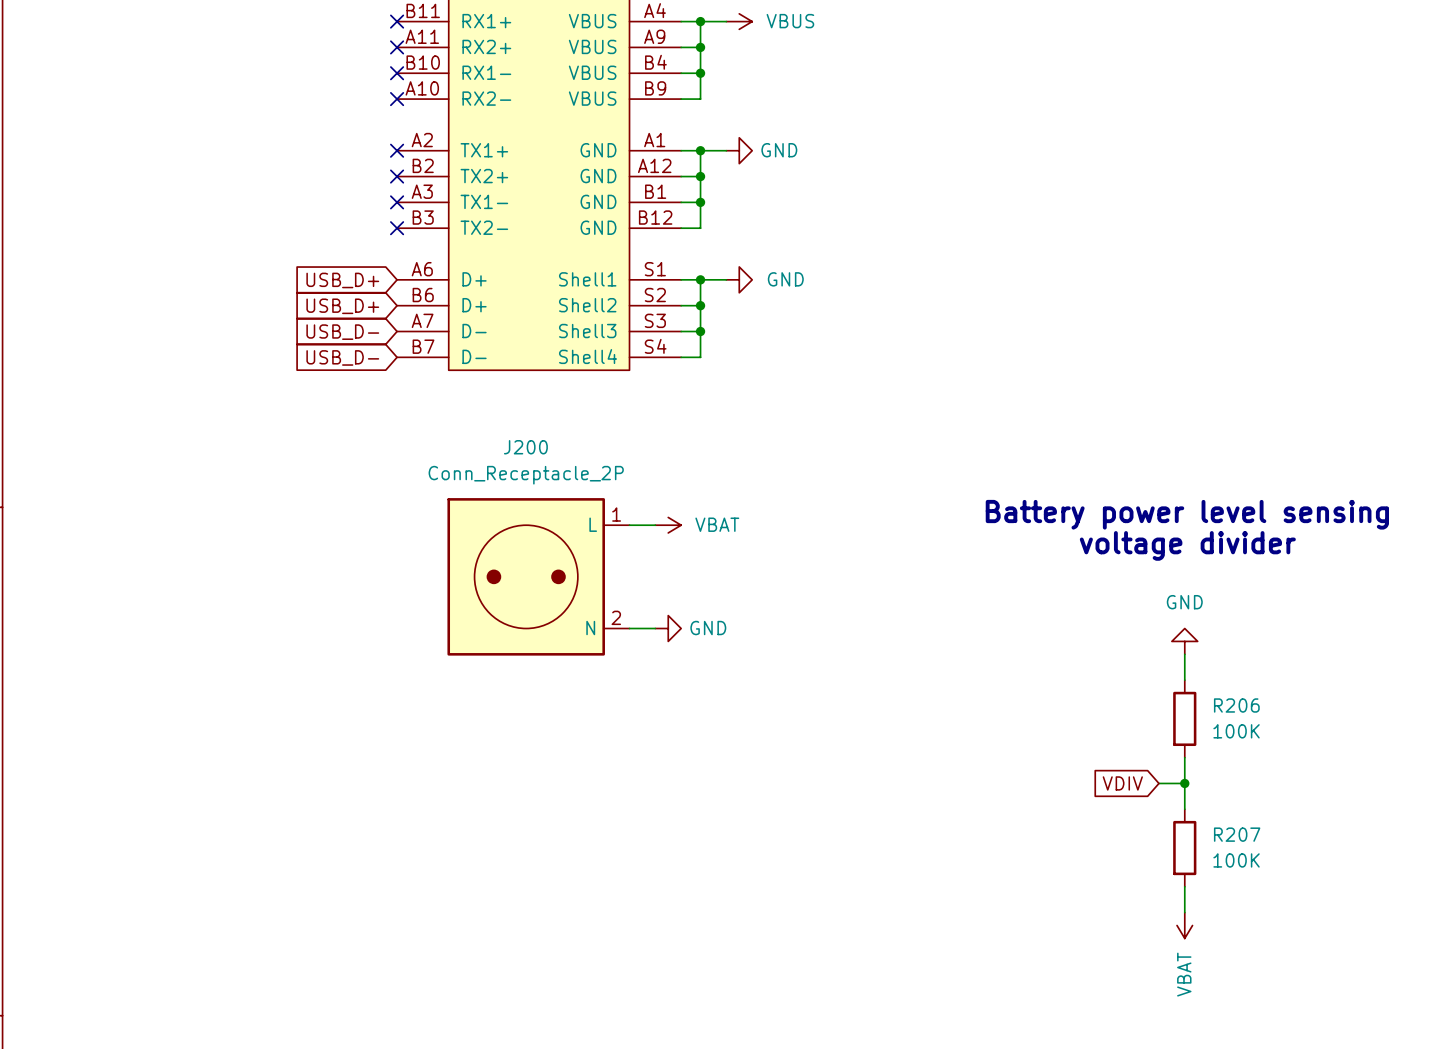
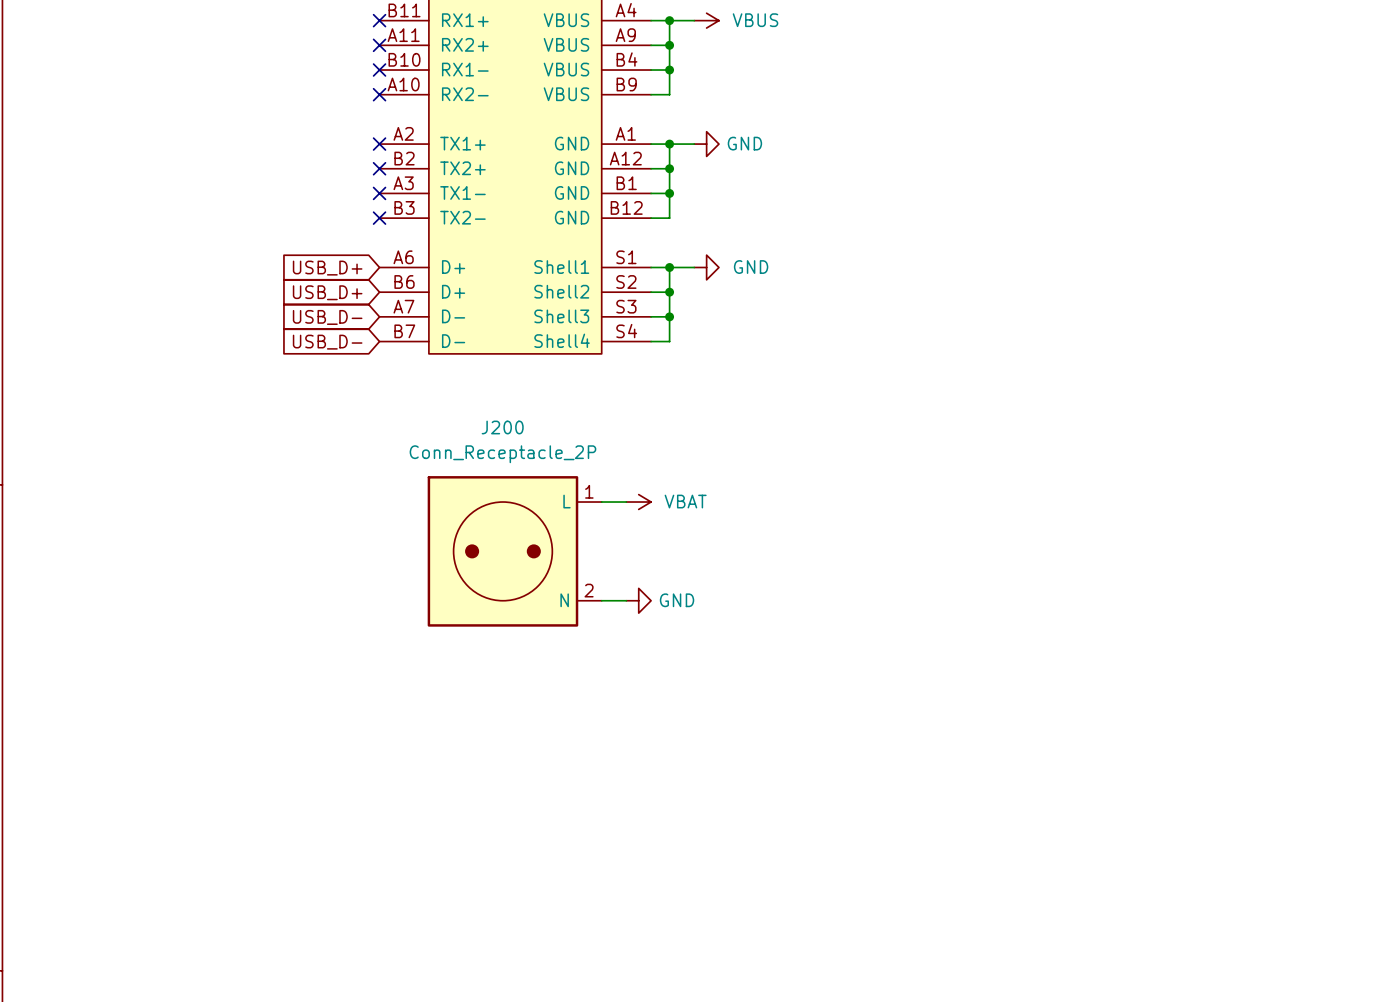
text: Battery power level sensing (1187, 514) -> none
text: voltage divider (1187, 545) -> none
power symbol: GND (1184, 641) -> none
wire: (1184, 654) (1184, 680) -> none
R206: 100K (1184, 718) -> none
wire: (1184, 757) (1184, 809) -> none
global label: VDIV (1122, 783) -> none
wire: (1158, 783) (1184, 783) -> none
junction: (1184, 783) -> none
R207: 100K (1184, 848) -> none
wire: (1184, 886) (1184, 912) -> none
power symbol: VBAT (1184, 925) -> none

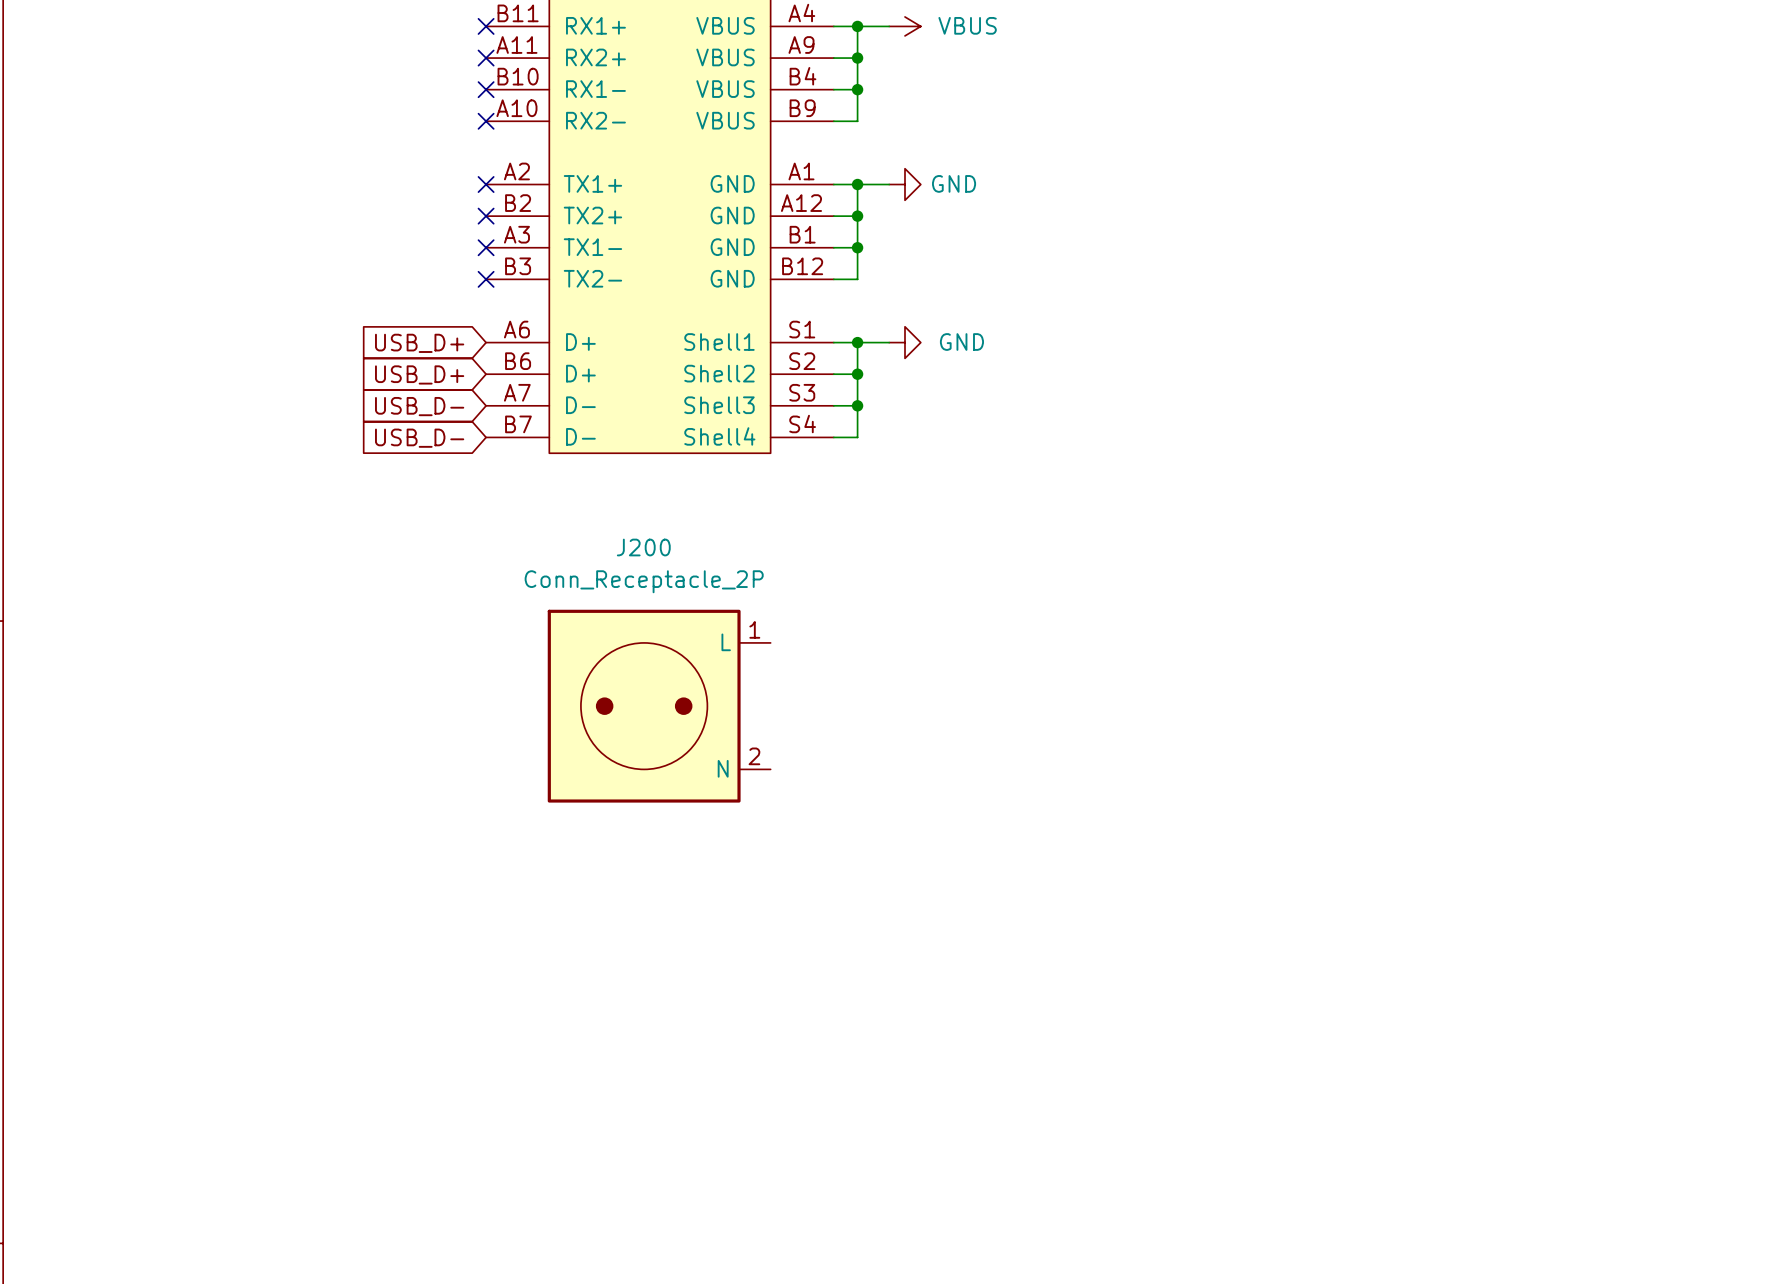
wire: (601, 502) (626, 502) -> none
power symbol: VBAT (638, 502) -> none
wire: (601, 600) (626, 600) -> none
power symbol: GND (638, 600) -> none

